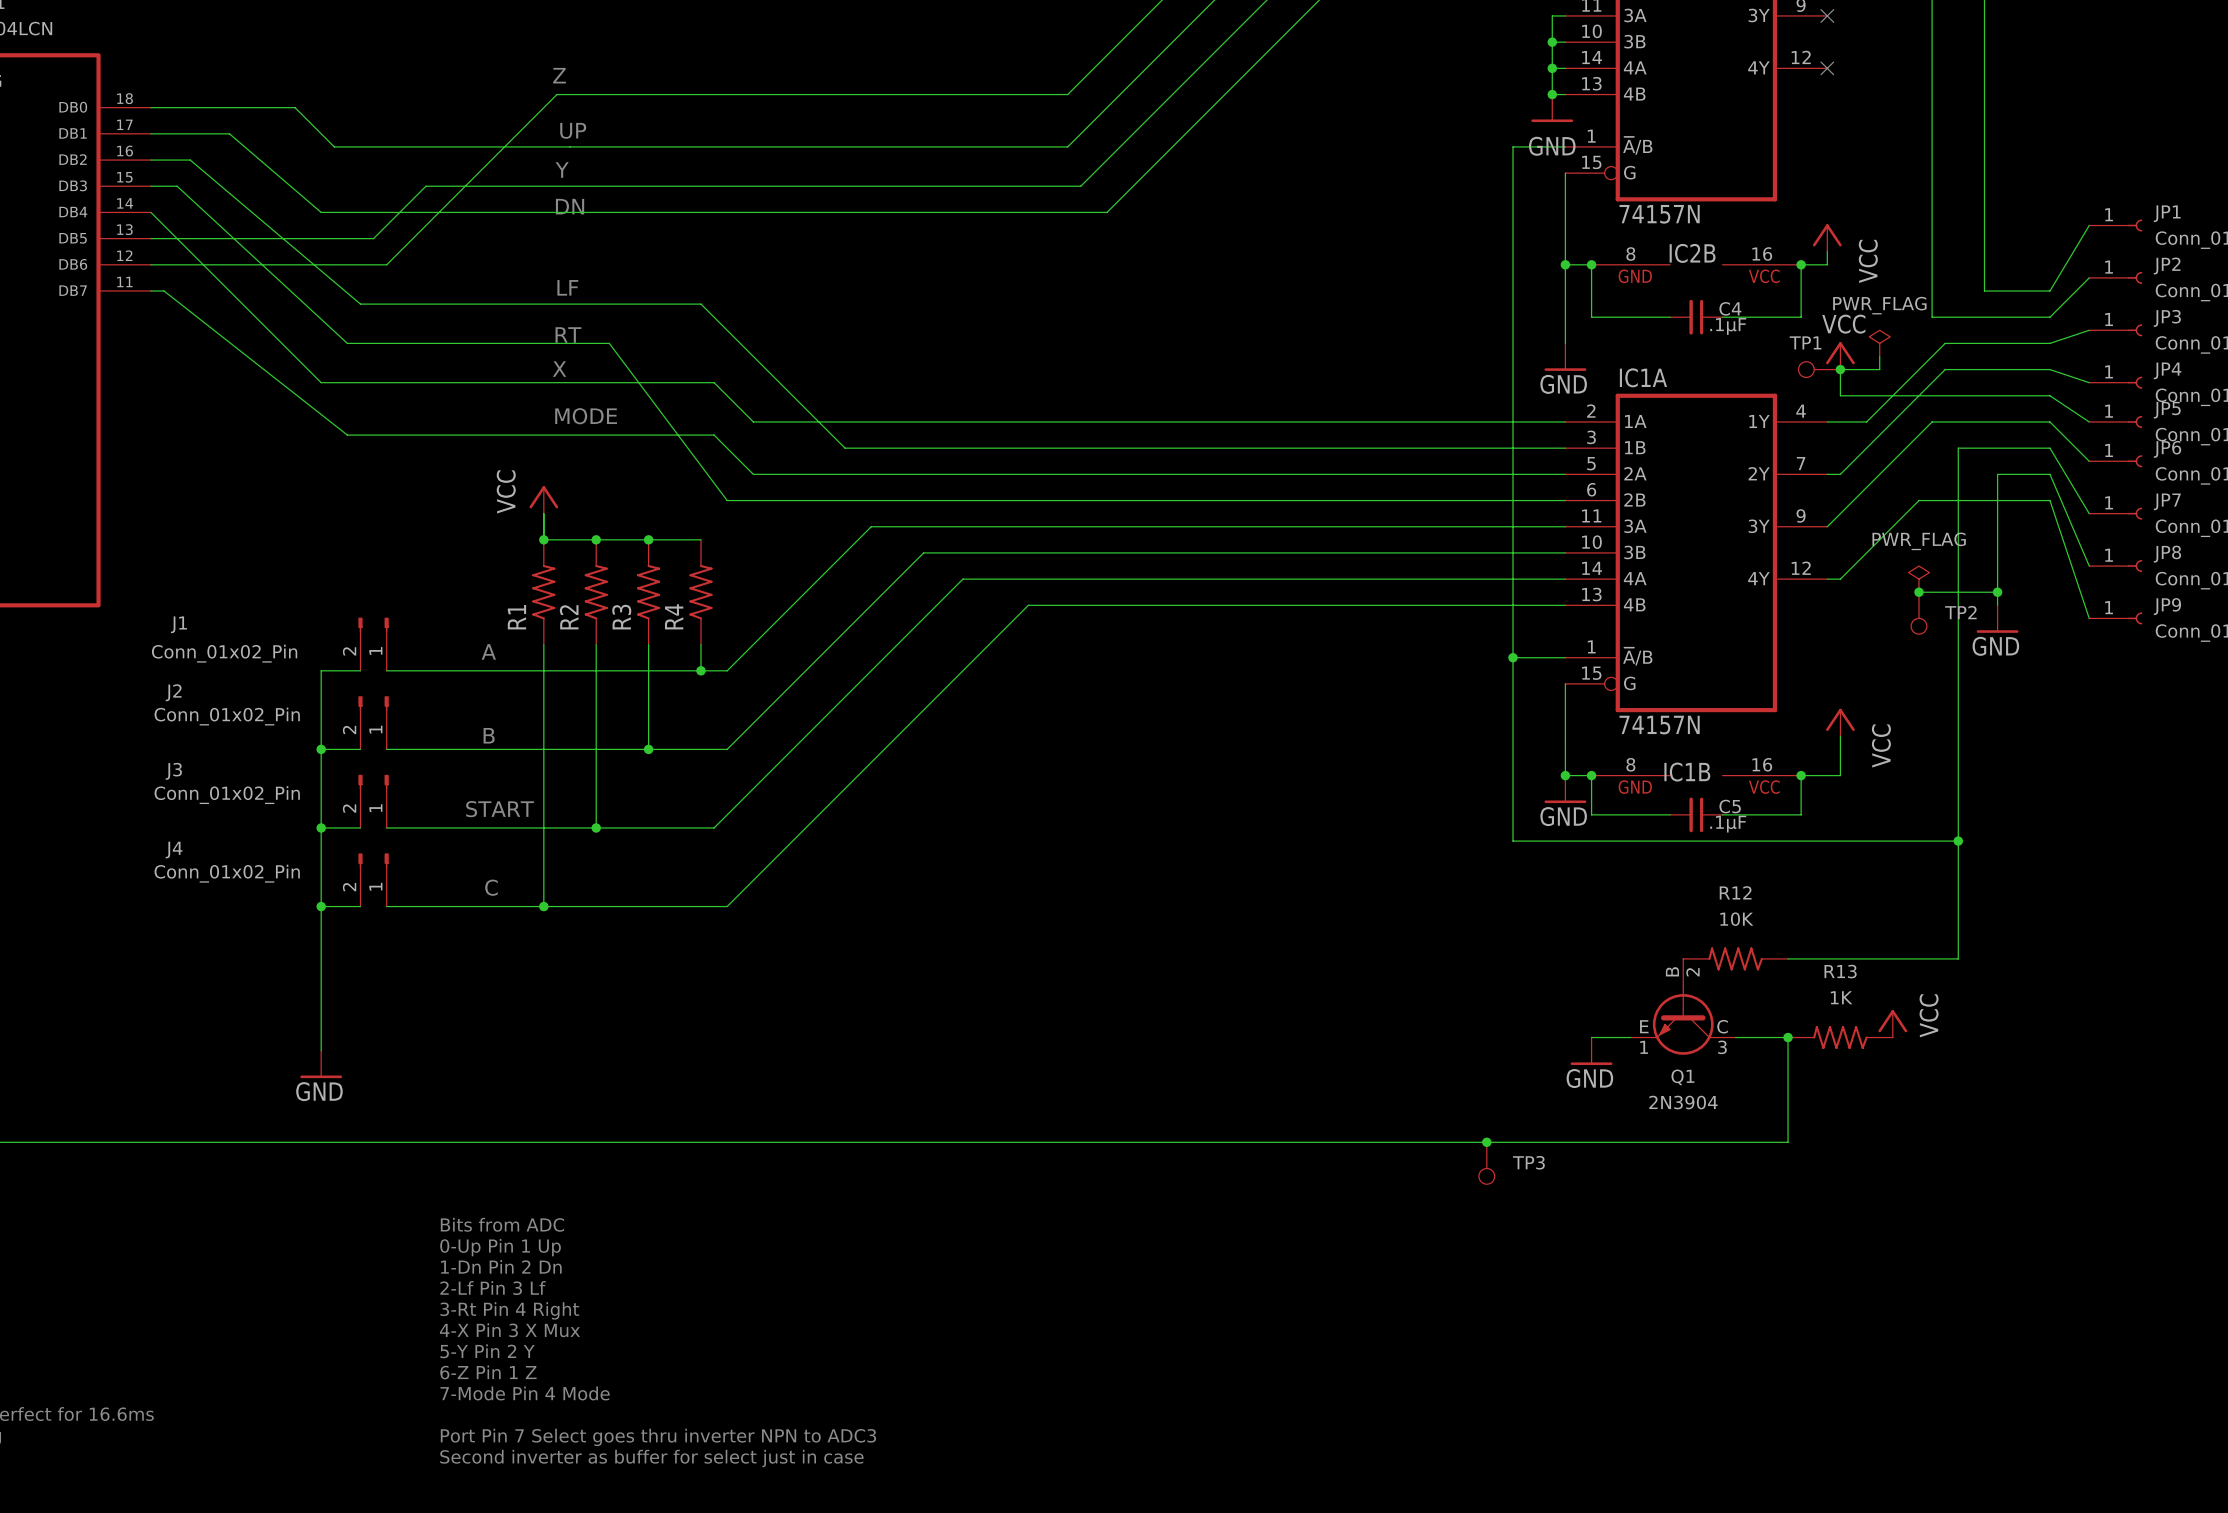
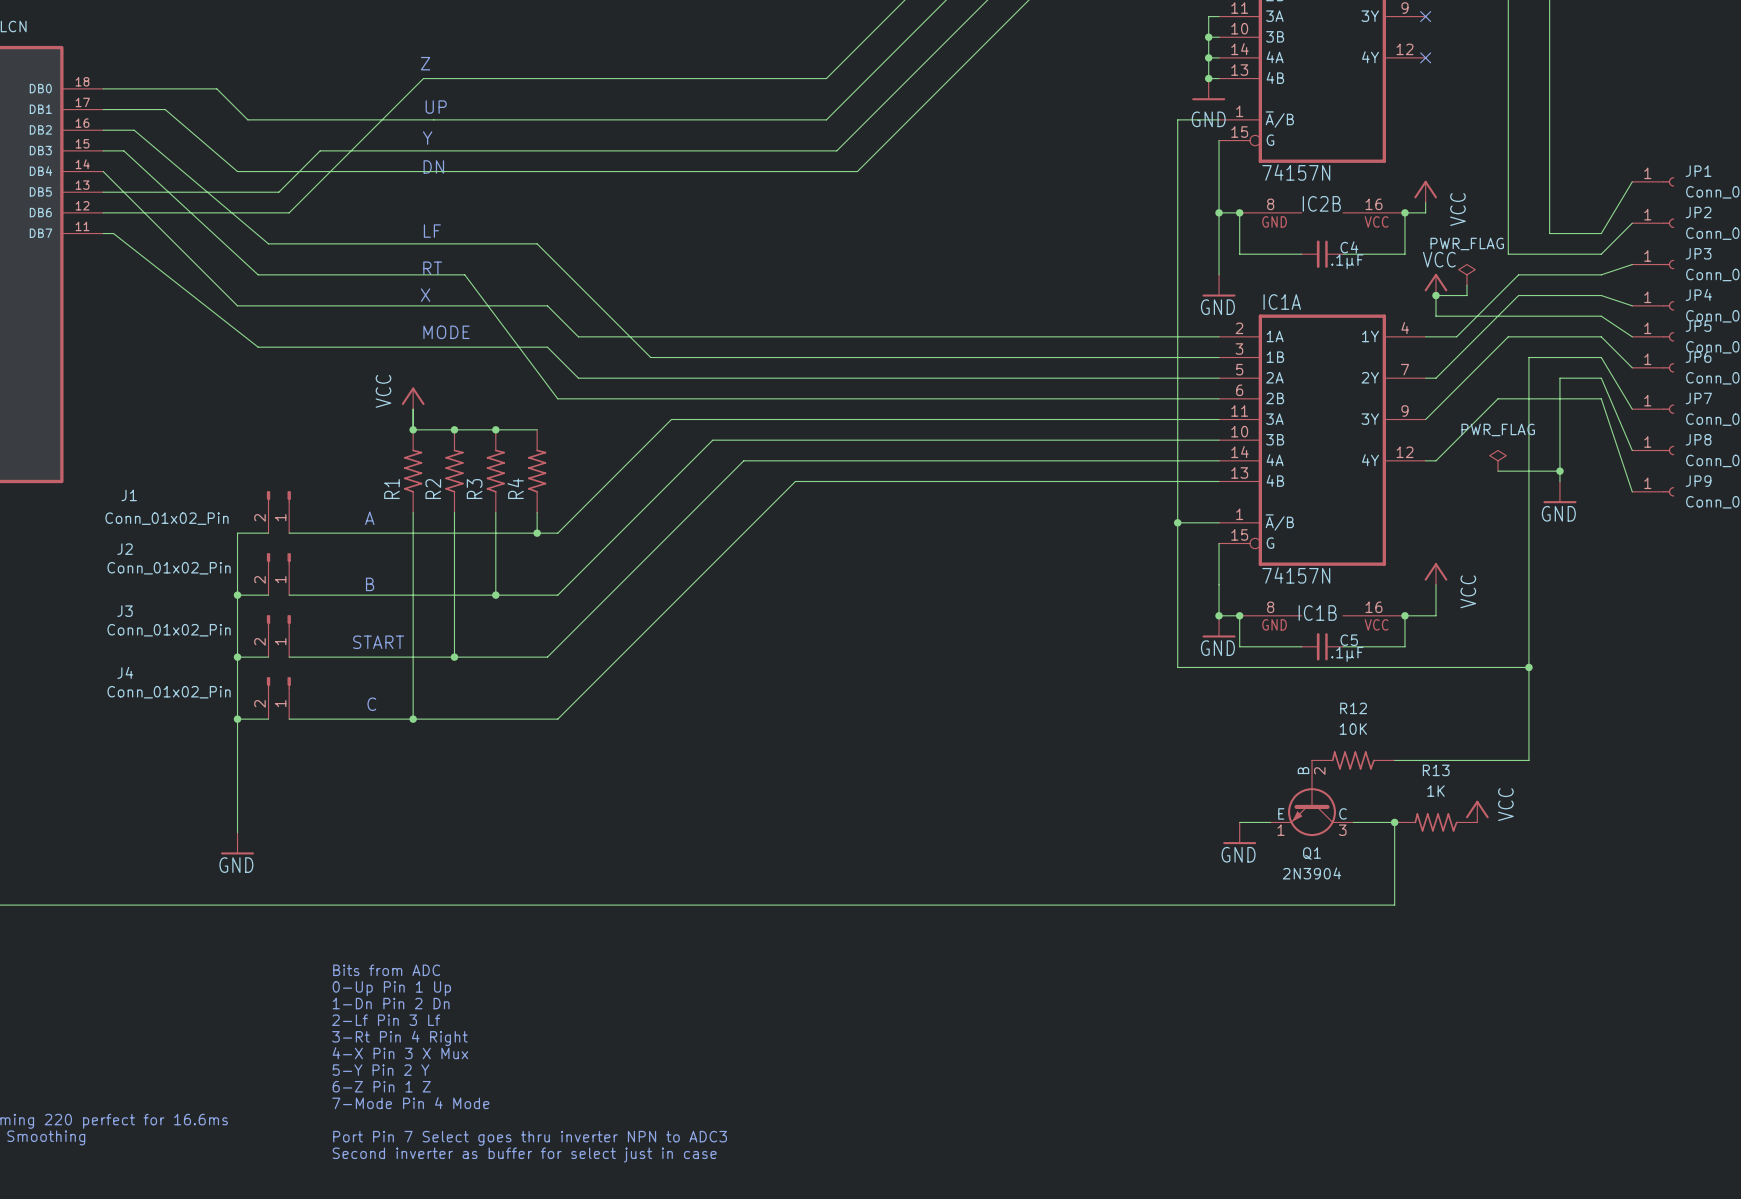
TP1: (1819, 369) -> none
junction: (1919, 592) -> none
TP2: (1919, 613) -> none
junction: (1486, 1142) -> none
TP3: (1486, 1163) -> none

